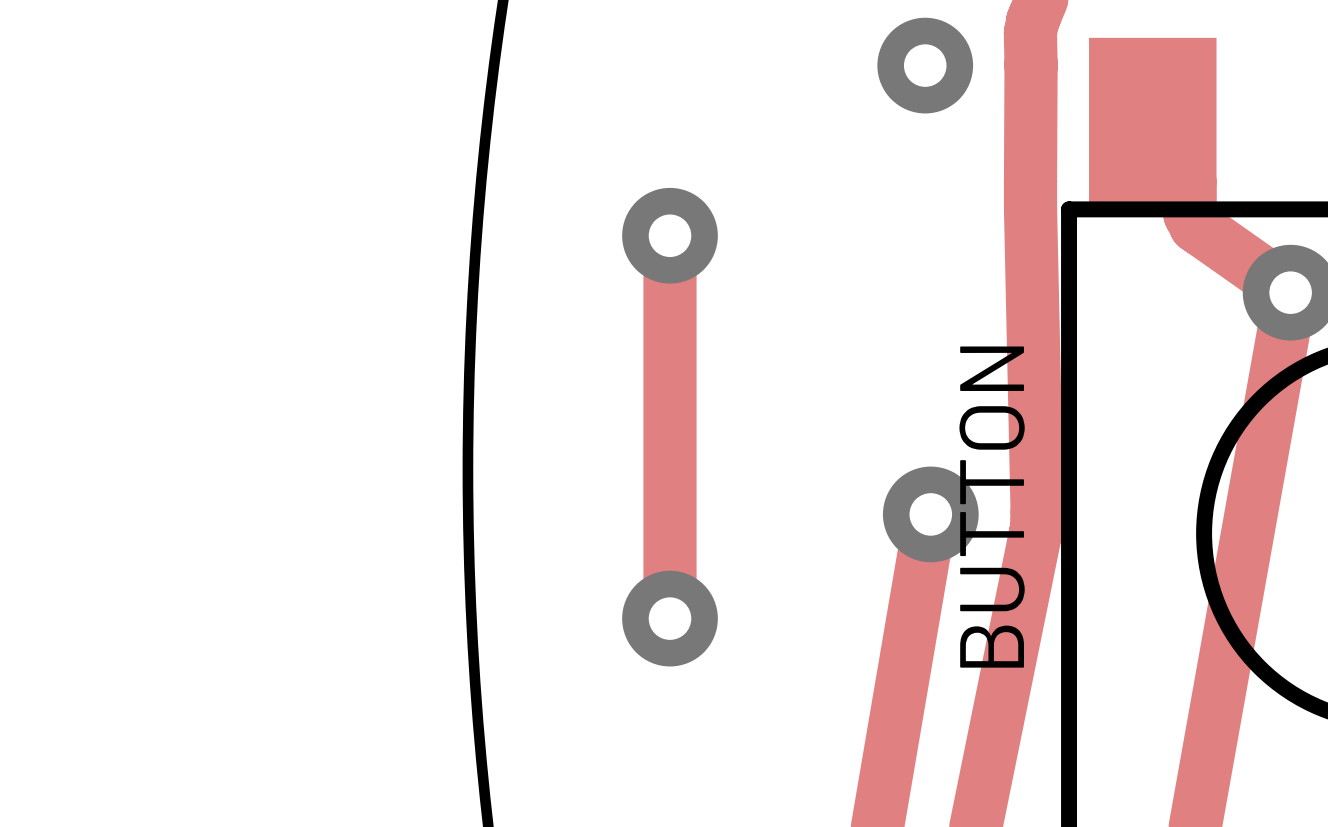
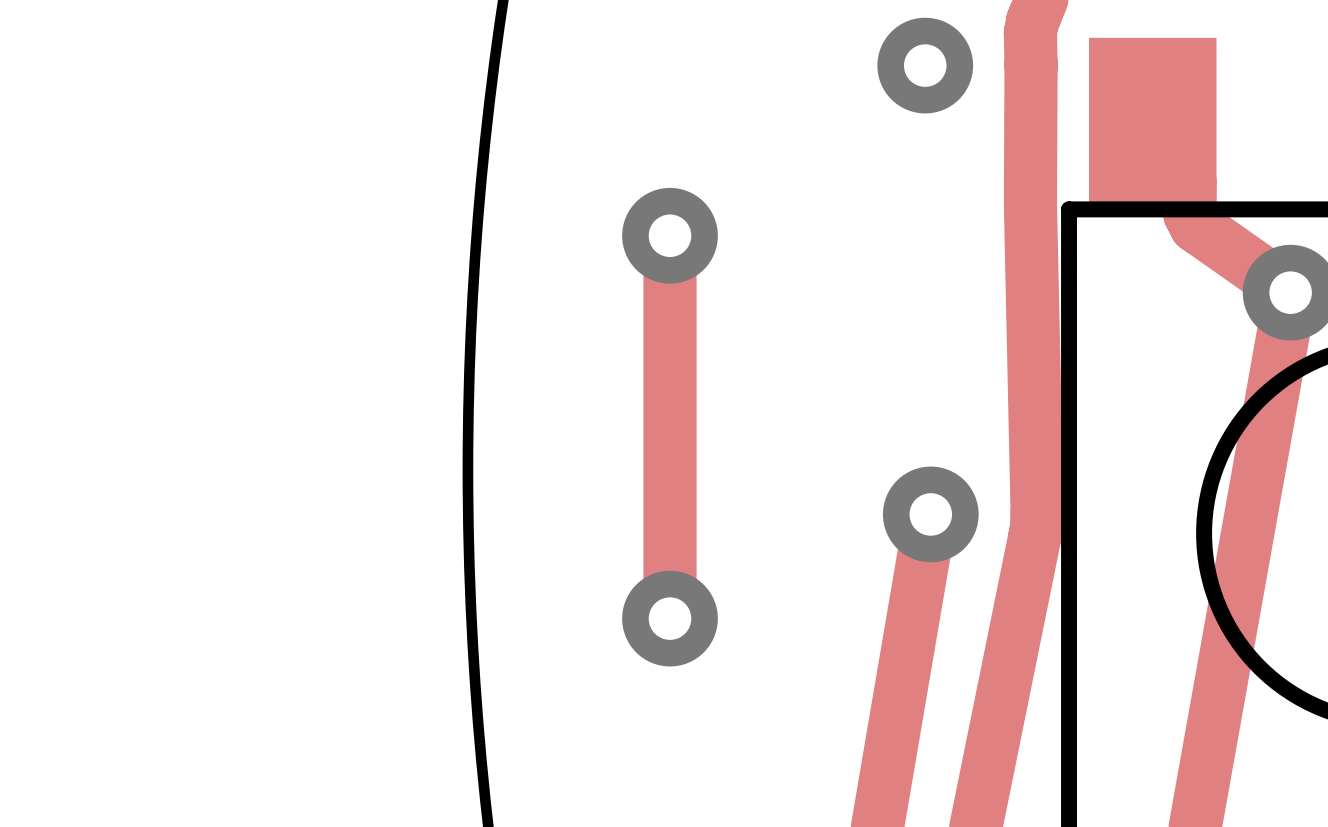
part value: BUTTON (992, 507) -> none

